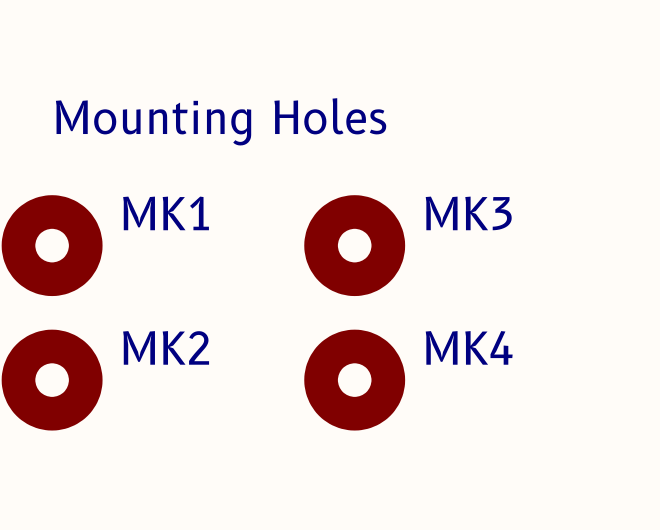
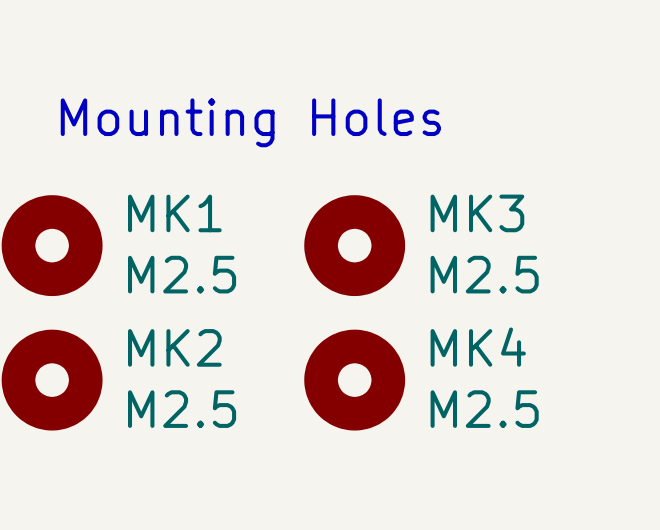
MK1 value: none -> M2.5 (182, 274)
MK3 value: none -> M2.5 (484, 274)
MK2 value: none -> M2.5 (182, 409)
MK4 value: none -> M2.5 (484, 409)

